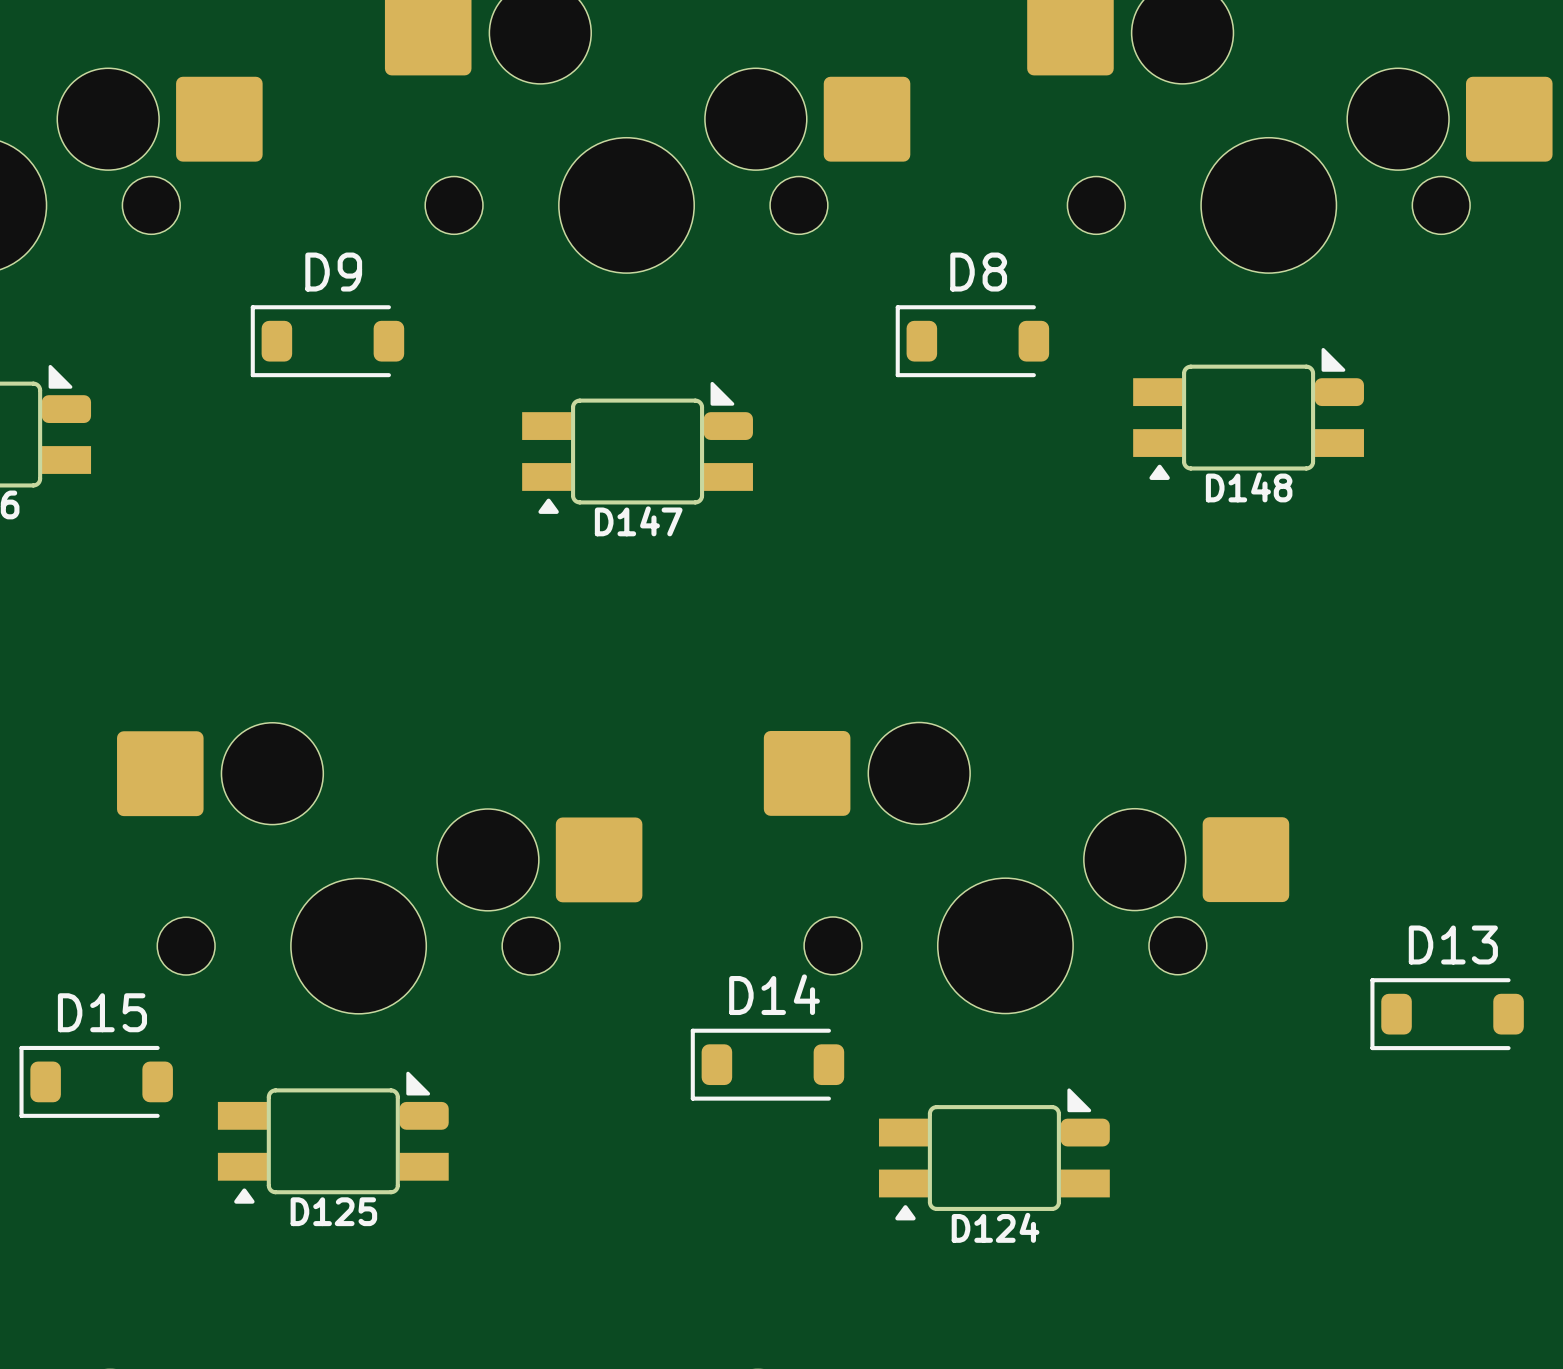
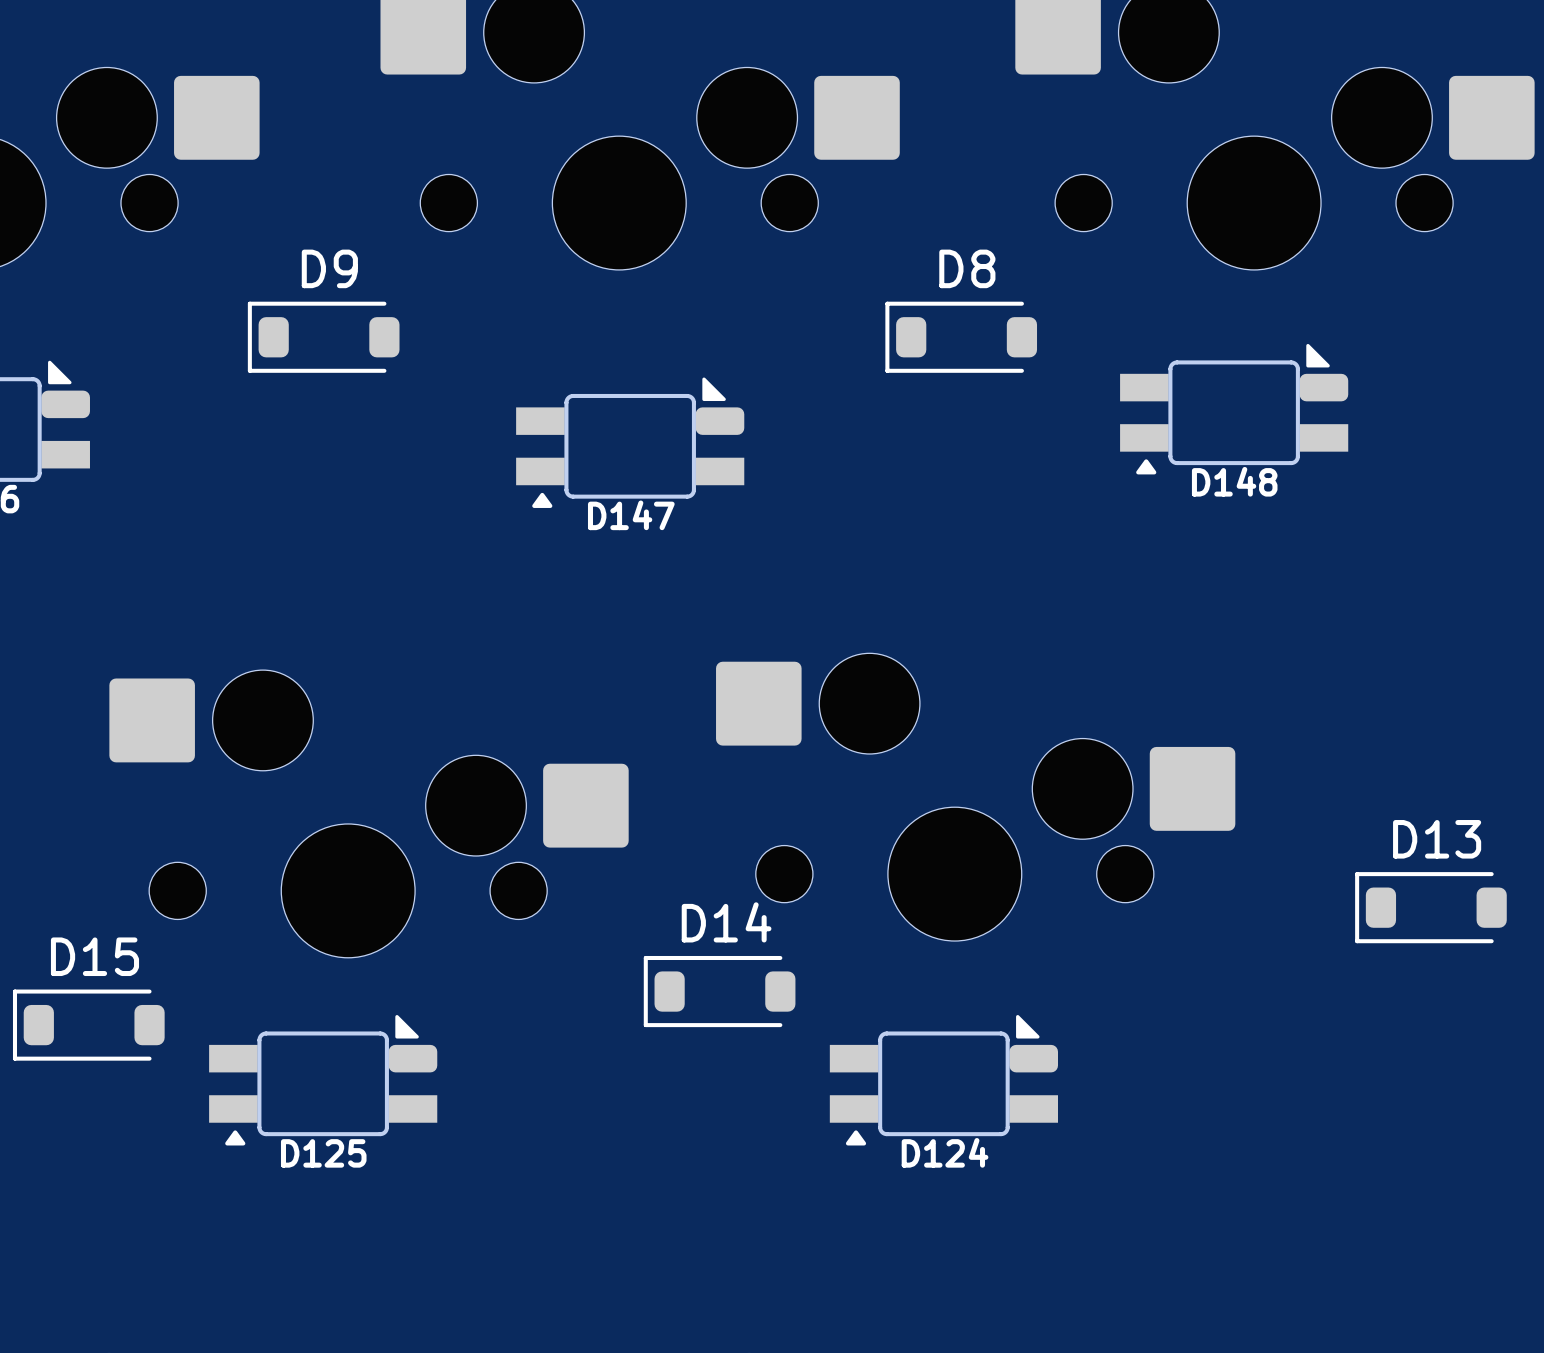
part position: (379, 868) -> (369, 813)
part position: (1026, 868) -> (975, 797)
D13 position: (1447, 1014) -> (1430, 907)
D14 position: (767, 1064) -> (719, 991)
D15 position: (96, 1081) -> (88, 1025)
D125 position: (333, 1137) -> (323, 1080)
D124 position: (994, 1154) -> (943, 1080)

